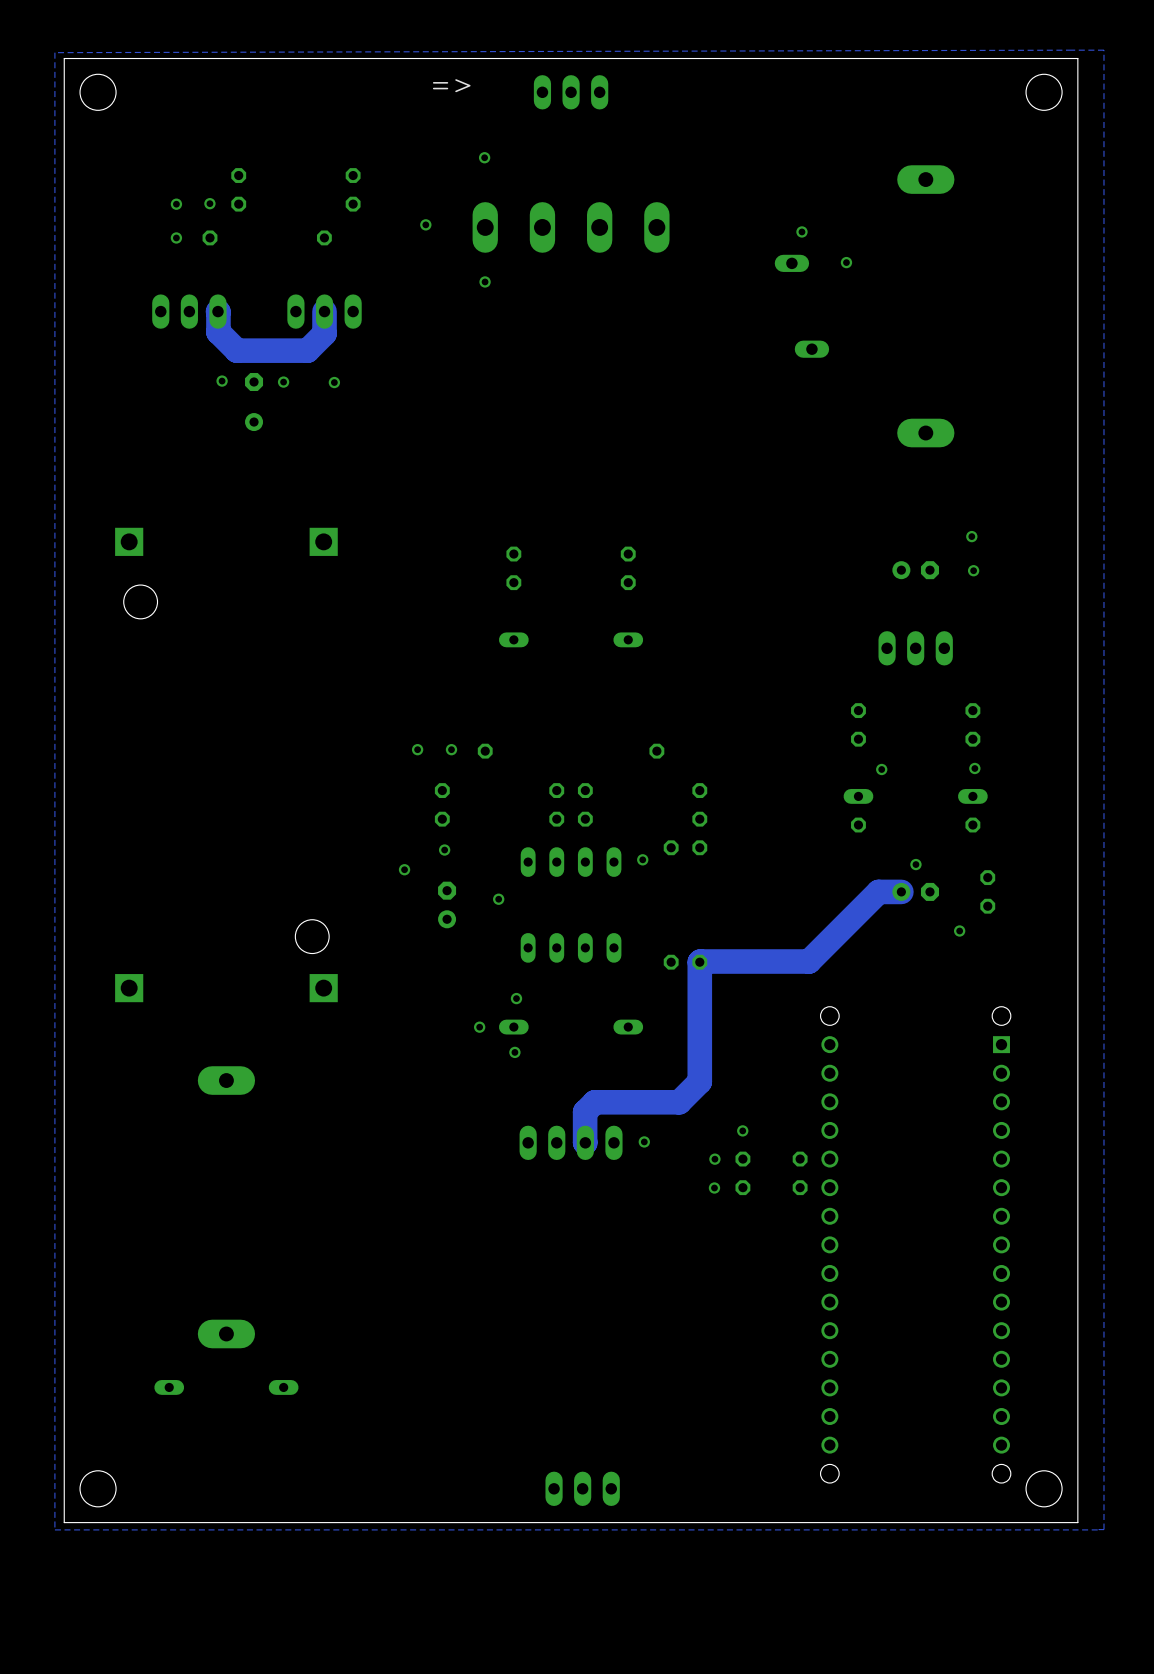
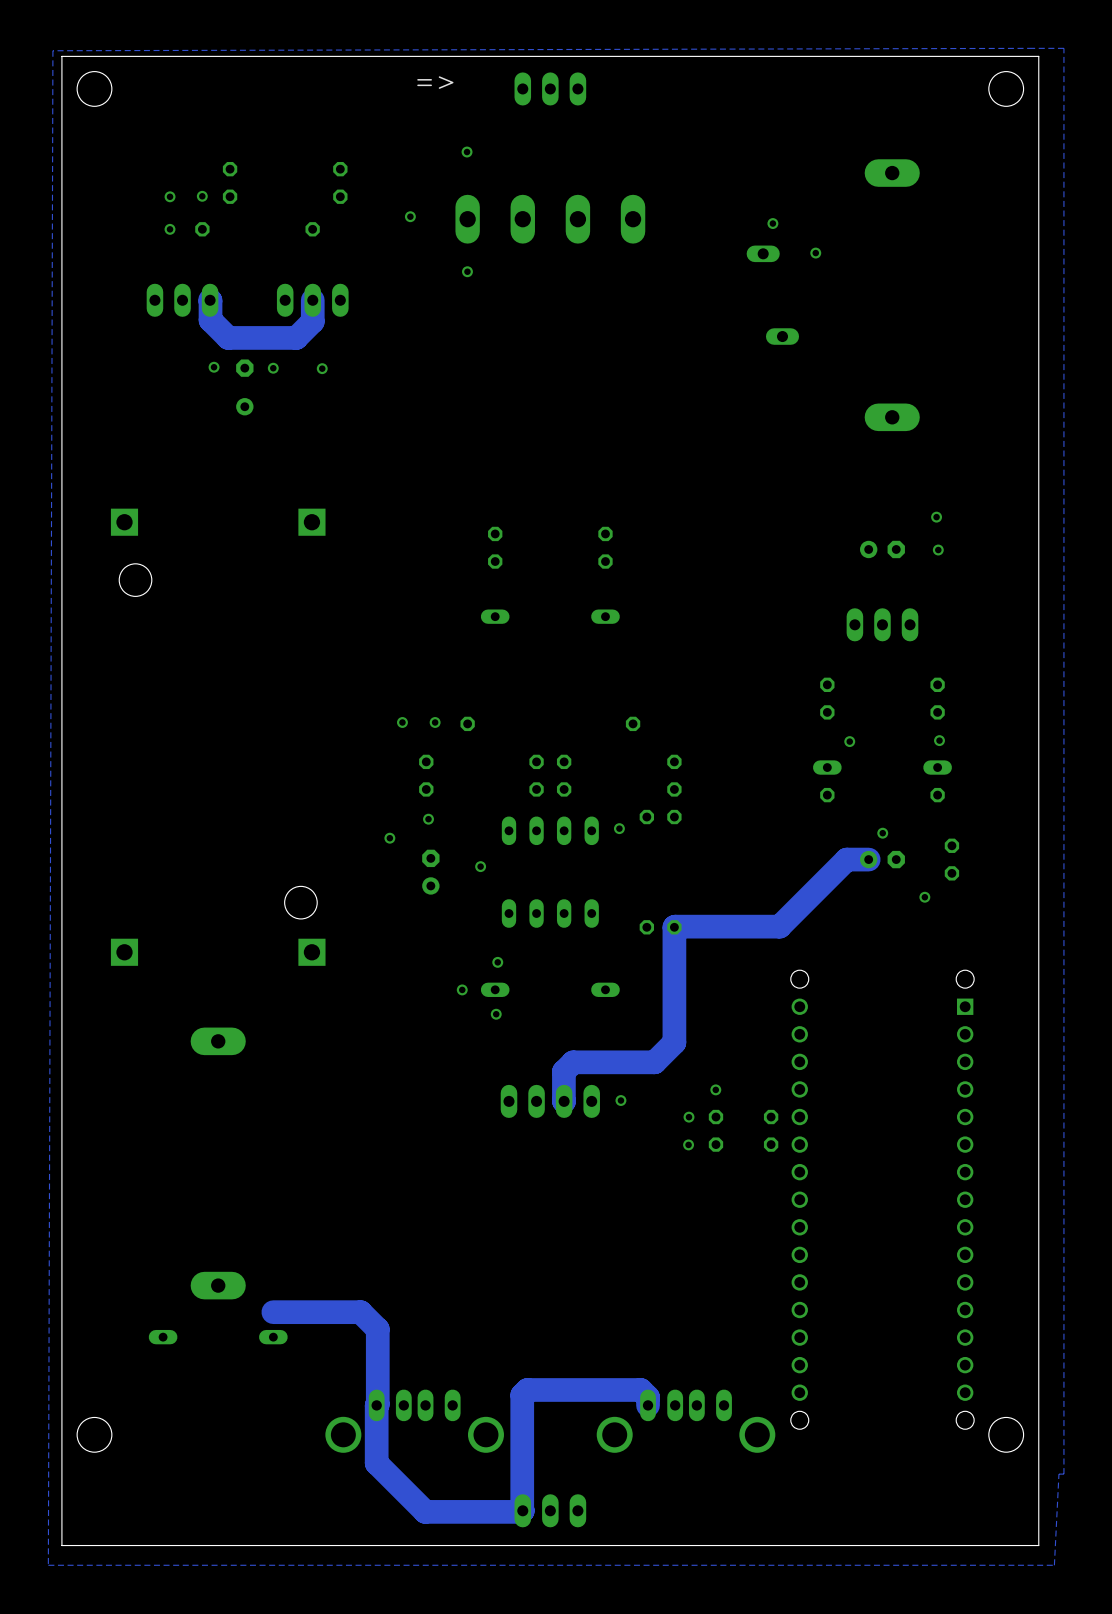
zone outline: (54, 52) (54, 1529) (1098, 1529) -> (52, 50) (48, 1565) (1054, 1565) (1058, 1474)
track: none -> (273, 1312) (360, 1312) (377, 1329) (376, 1463) (425, 1511) (522, 1510) (522, 1395) (527, 1389) (640, 1389) (648, 1397) (648, 1405)
part: none -> (414, 1421)
part: none -> (686, 1421)
part position: (582, 1488) -> (550, 1510)
board edge: (1077, 1522) (64, 1522) -> (1038, 1467) (1038, 1545) (61, 1545) (61, 1467)

